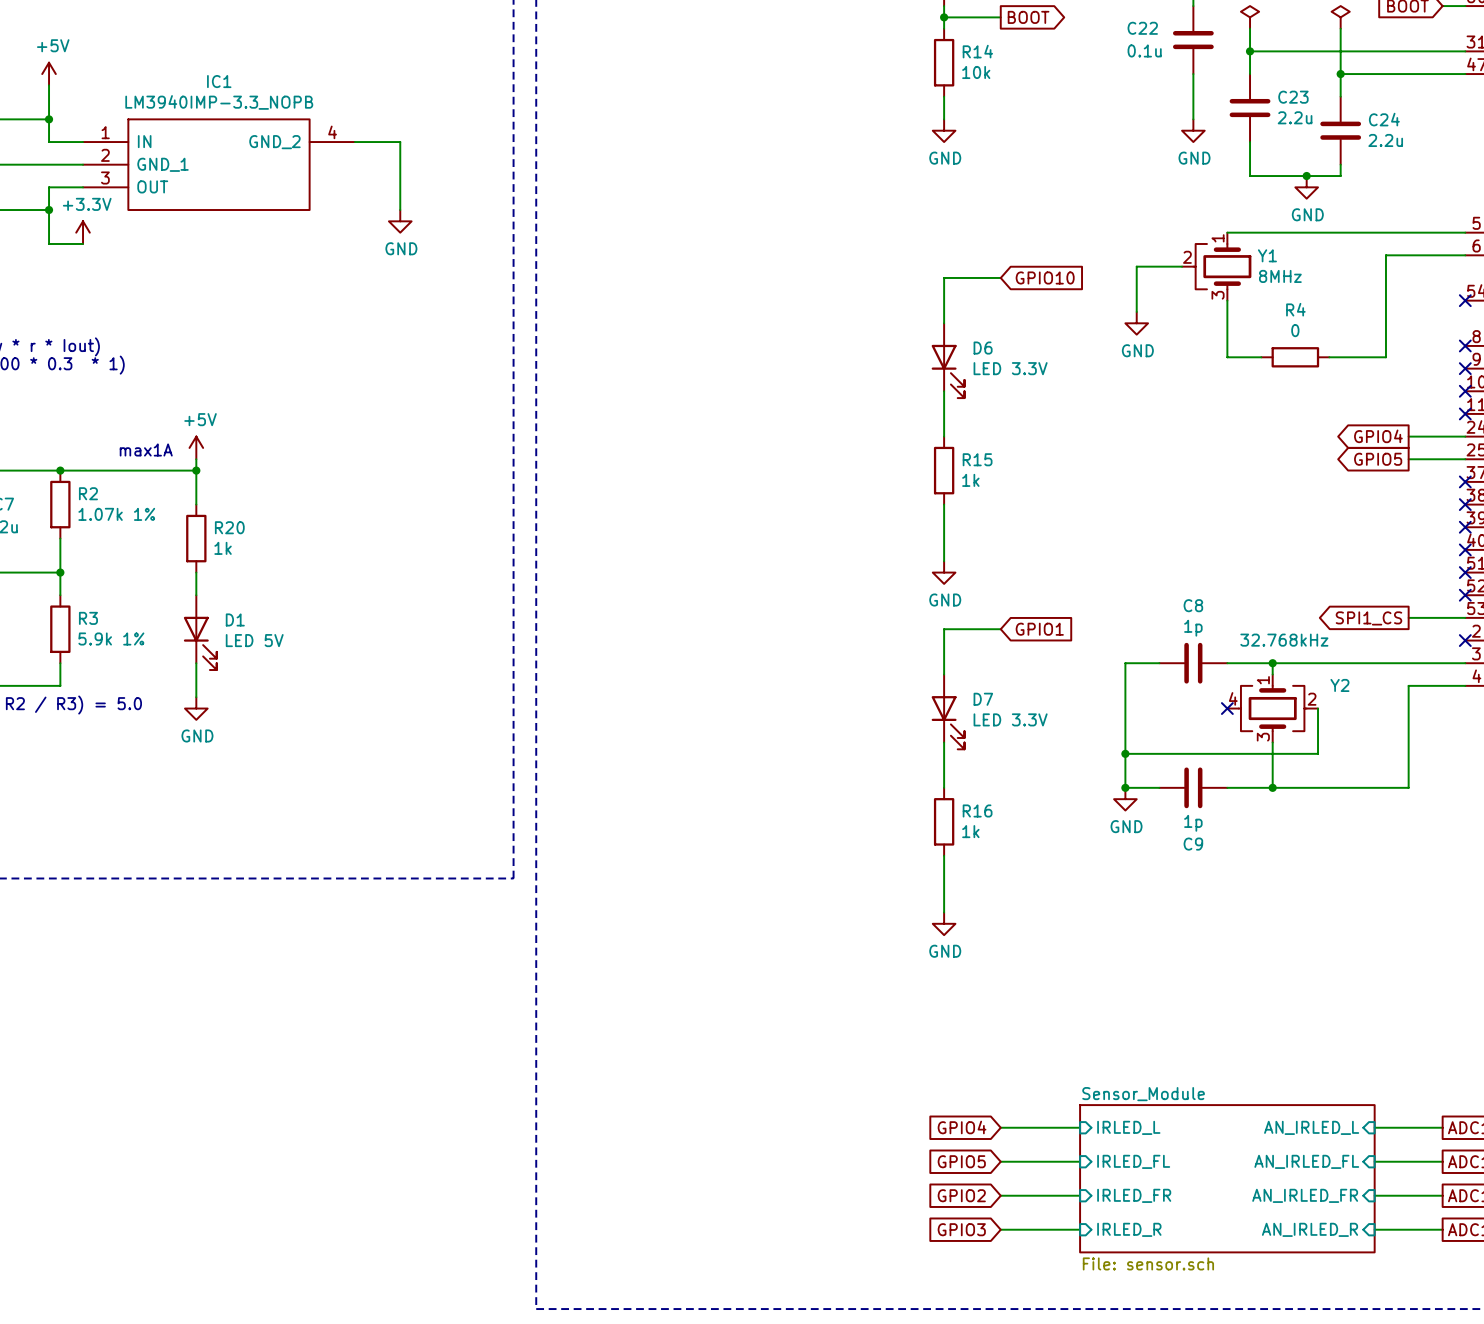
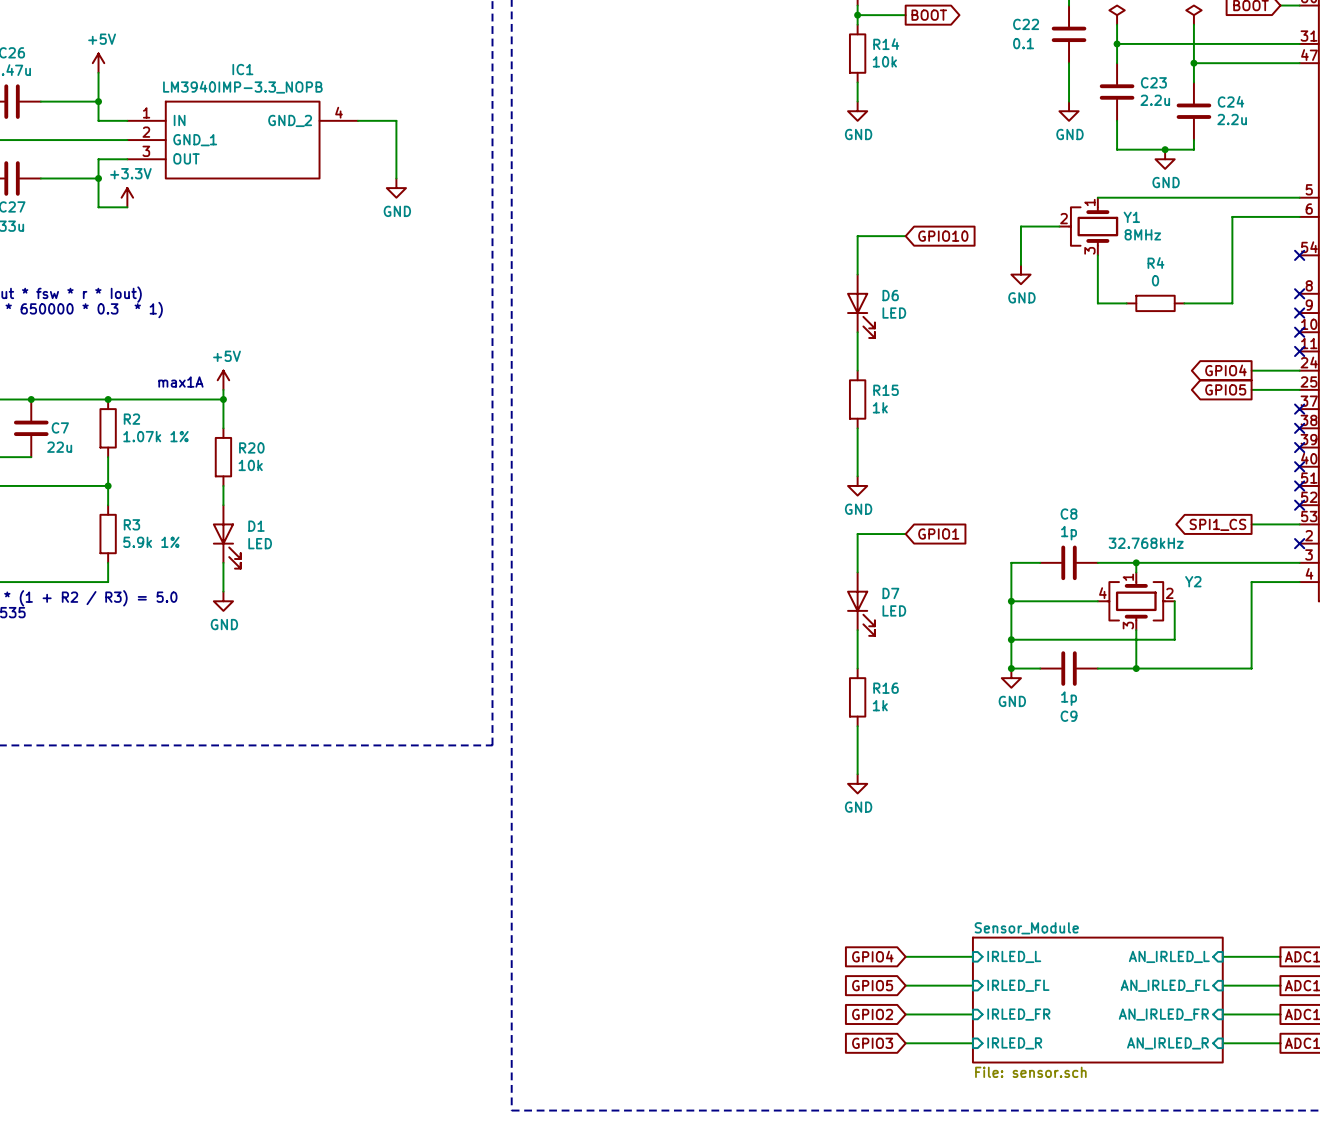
C22 value: 0.1u (1144, 50) -> 0.1 (1023, 43)
D6 value: LED 3.3V (1010, 368) -> LED (894, 313)
R20 value: 1k (223, 548) -> 10k (250, 465)
D1 value: LED 5V (254, 640) -> LED (260, 543)
wire: none -> (1011, 601) (1097, 601)
junction: none -> (1011, 601)
no-connect mark: (1227, 708) -> none
D7 value: LED 3.3V (1010, 719) -> LED (894, 610)

